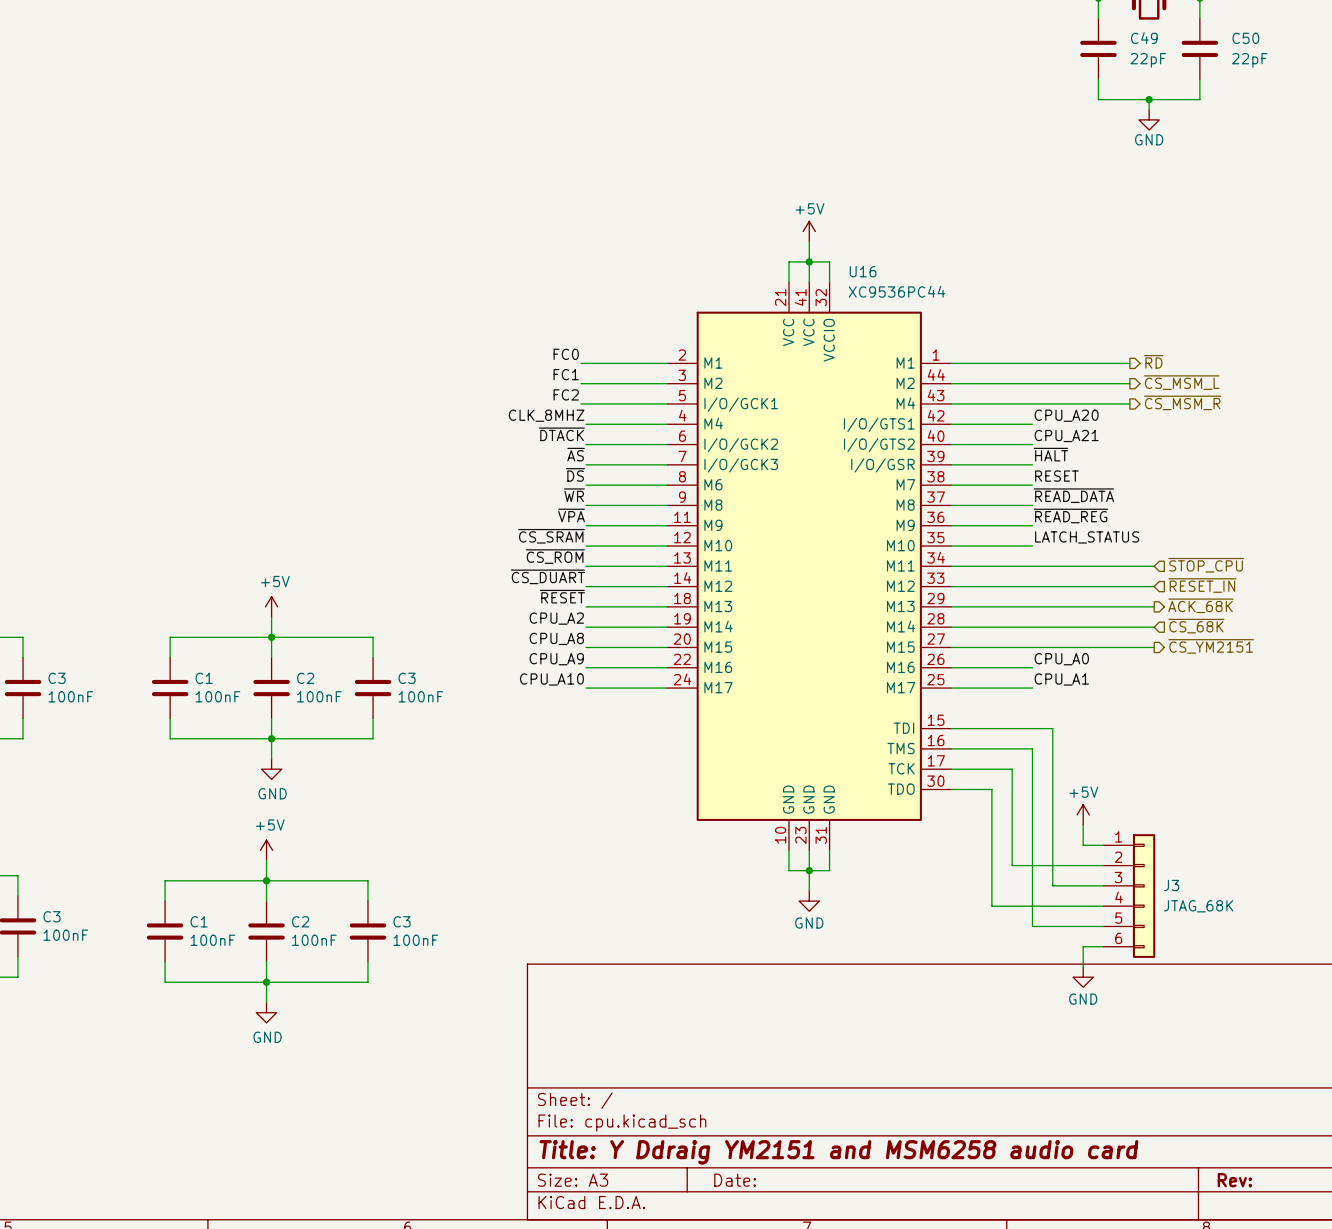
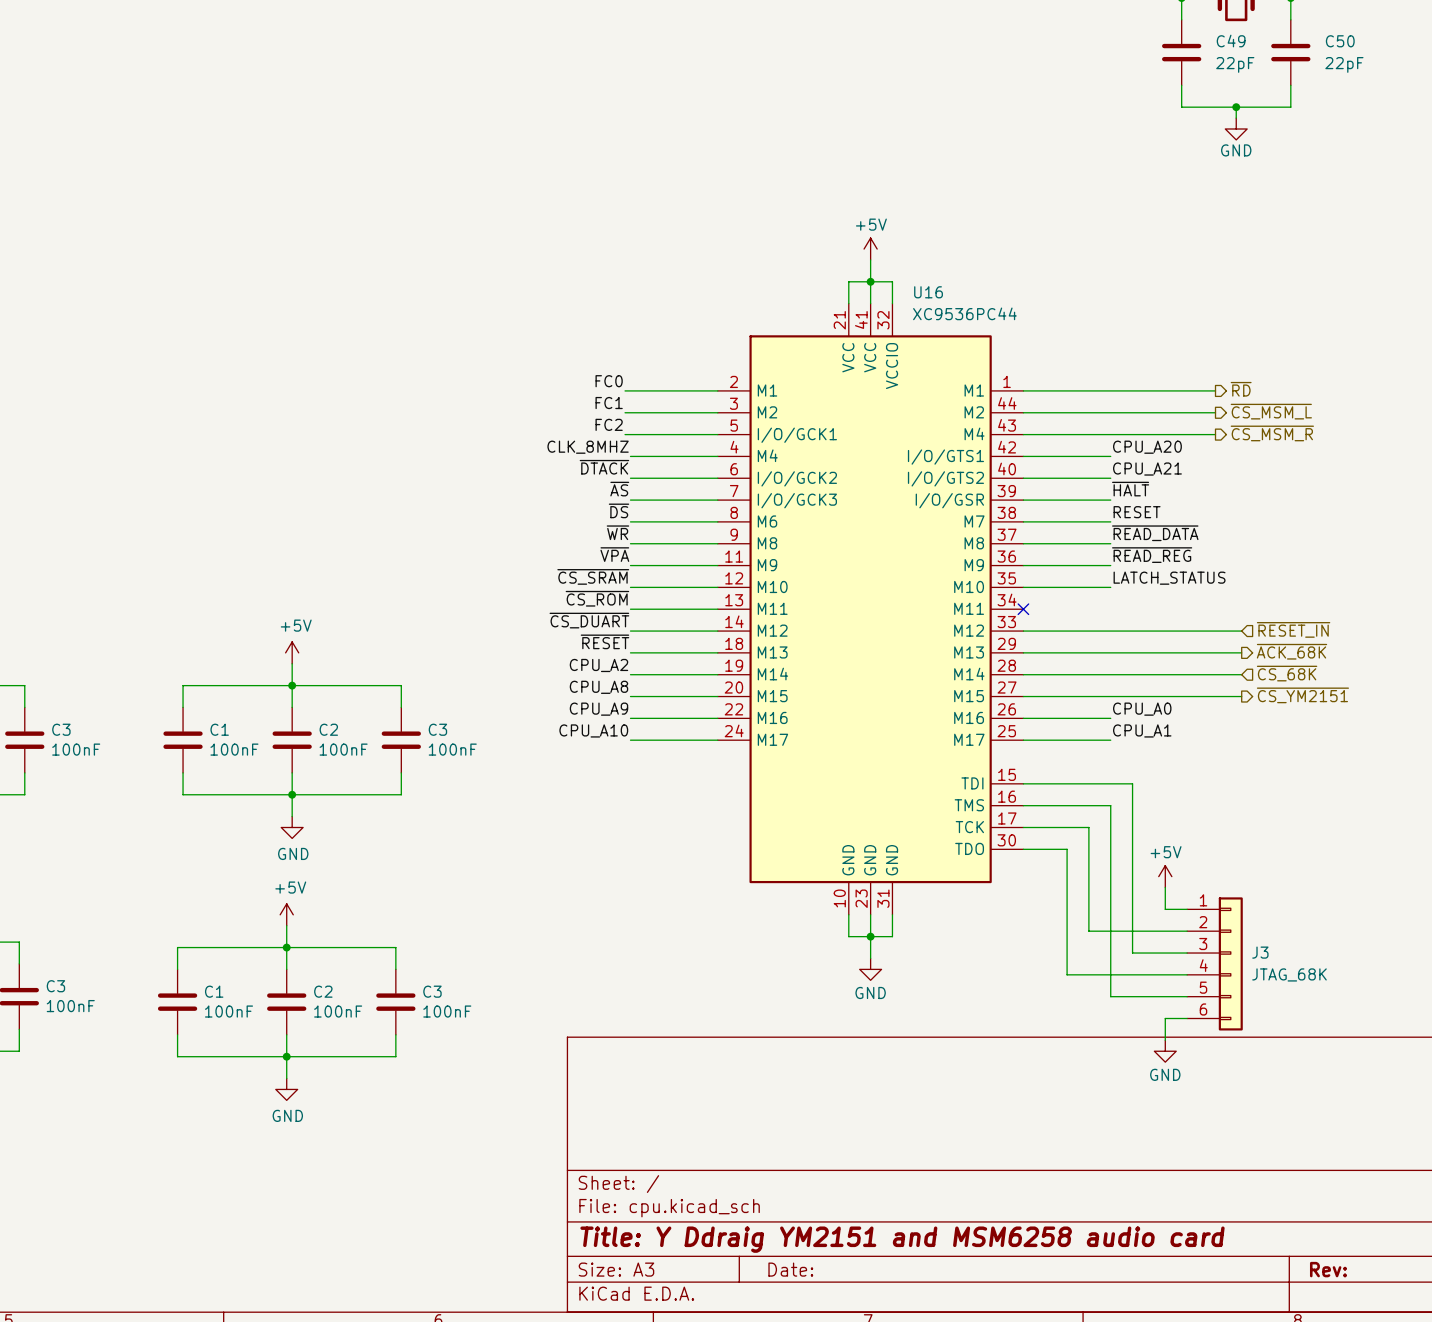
hierarchical label: ~{STOP_CPU} (1206, 565) -> none
wire: (951, 566) (1154, 566) -> none
no-connect mark: none -> (1023, 609)

